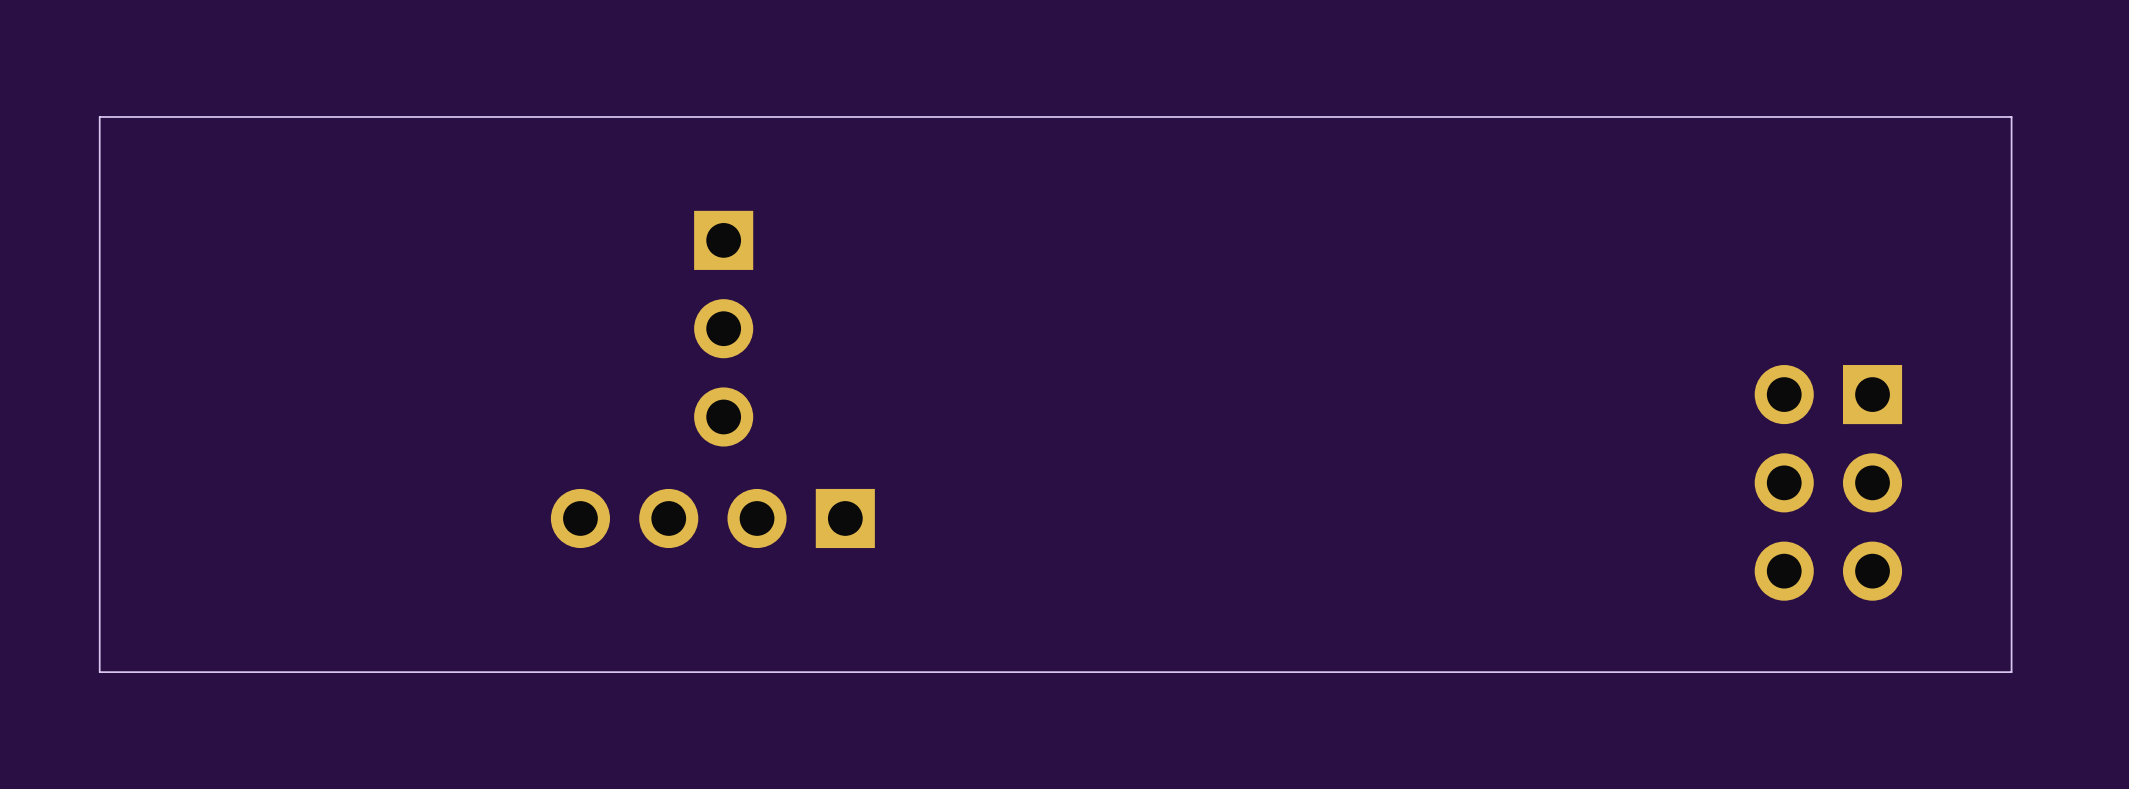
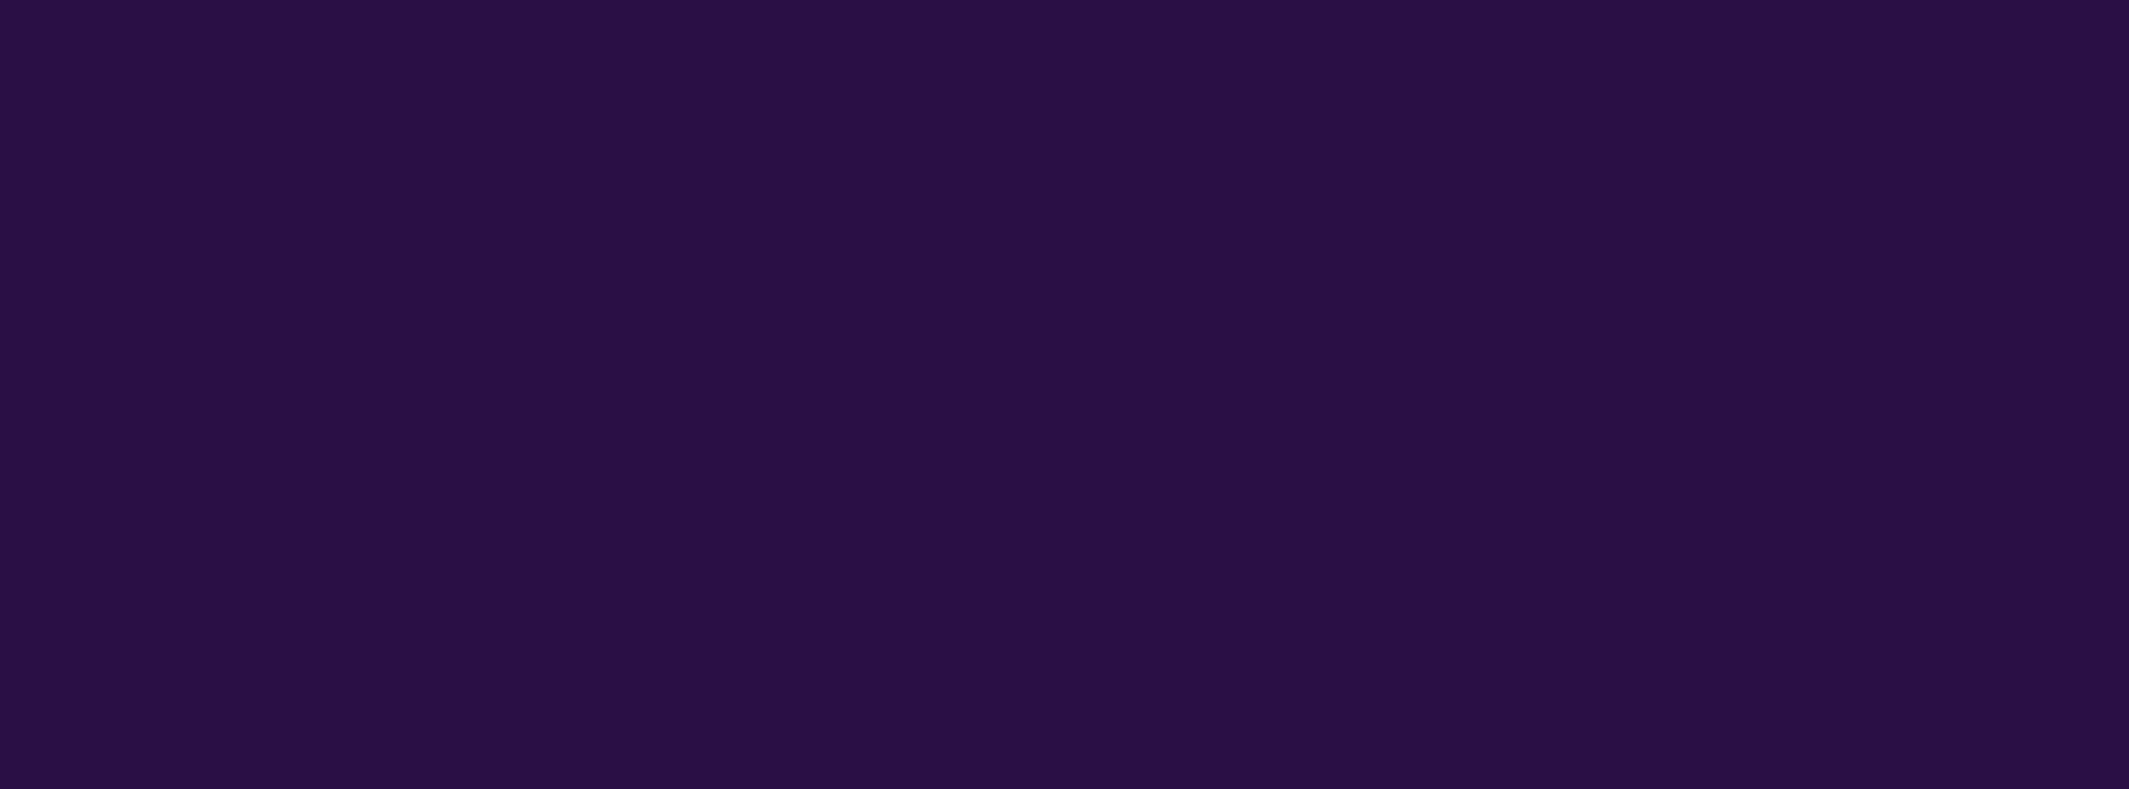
board edge: (2011, 116) (99, 116) (99, 672) (2011, 672) (2011, 116) -> none
part: (723, 328) -> none
part: (1828, 482) -> none
part: (712, 518) -> none

